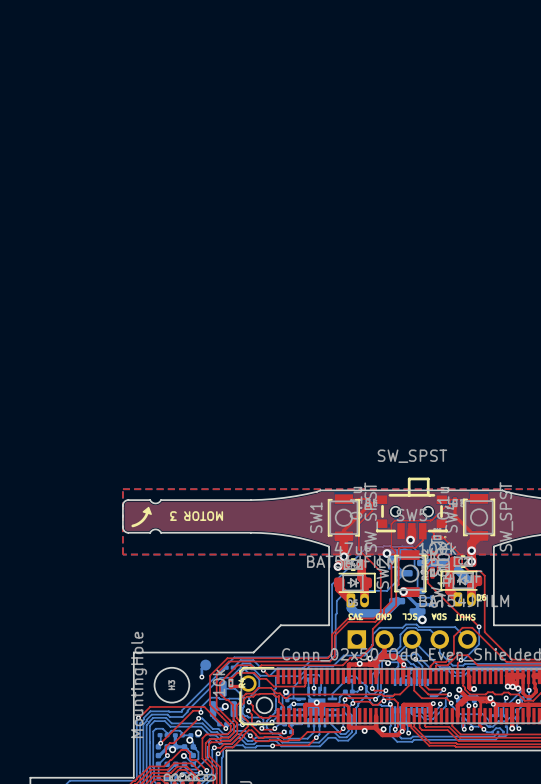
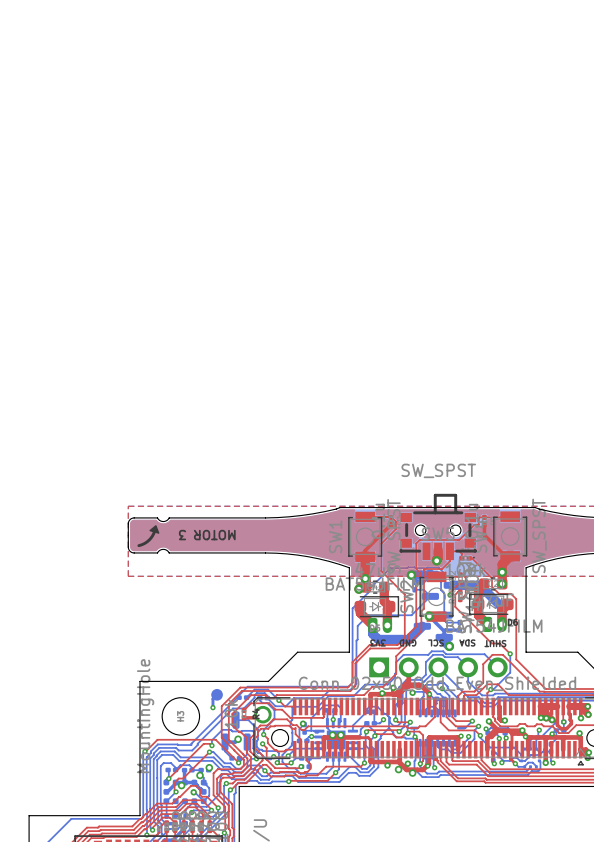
via: none -> (332, 735)
via: (316, 702) -> none
via: none -> (340, 735)
via: none -> (398, 769)
via: none -> (412, 773)

